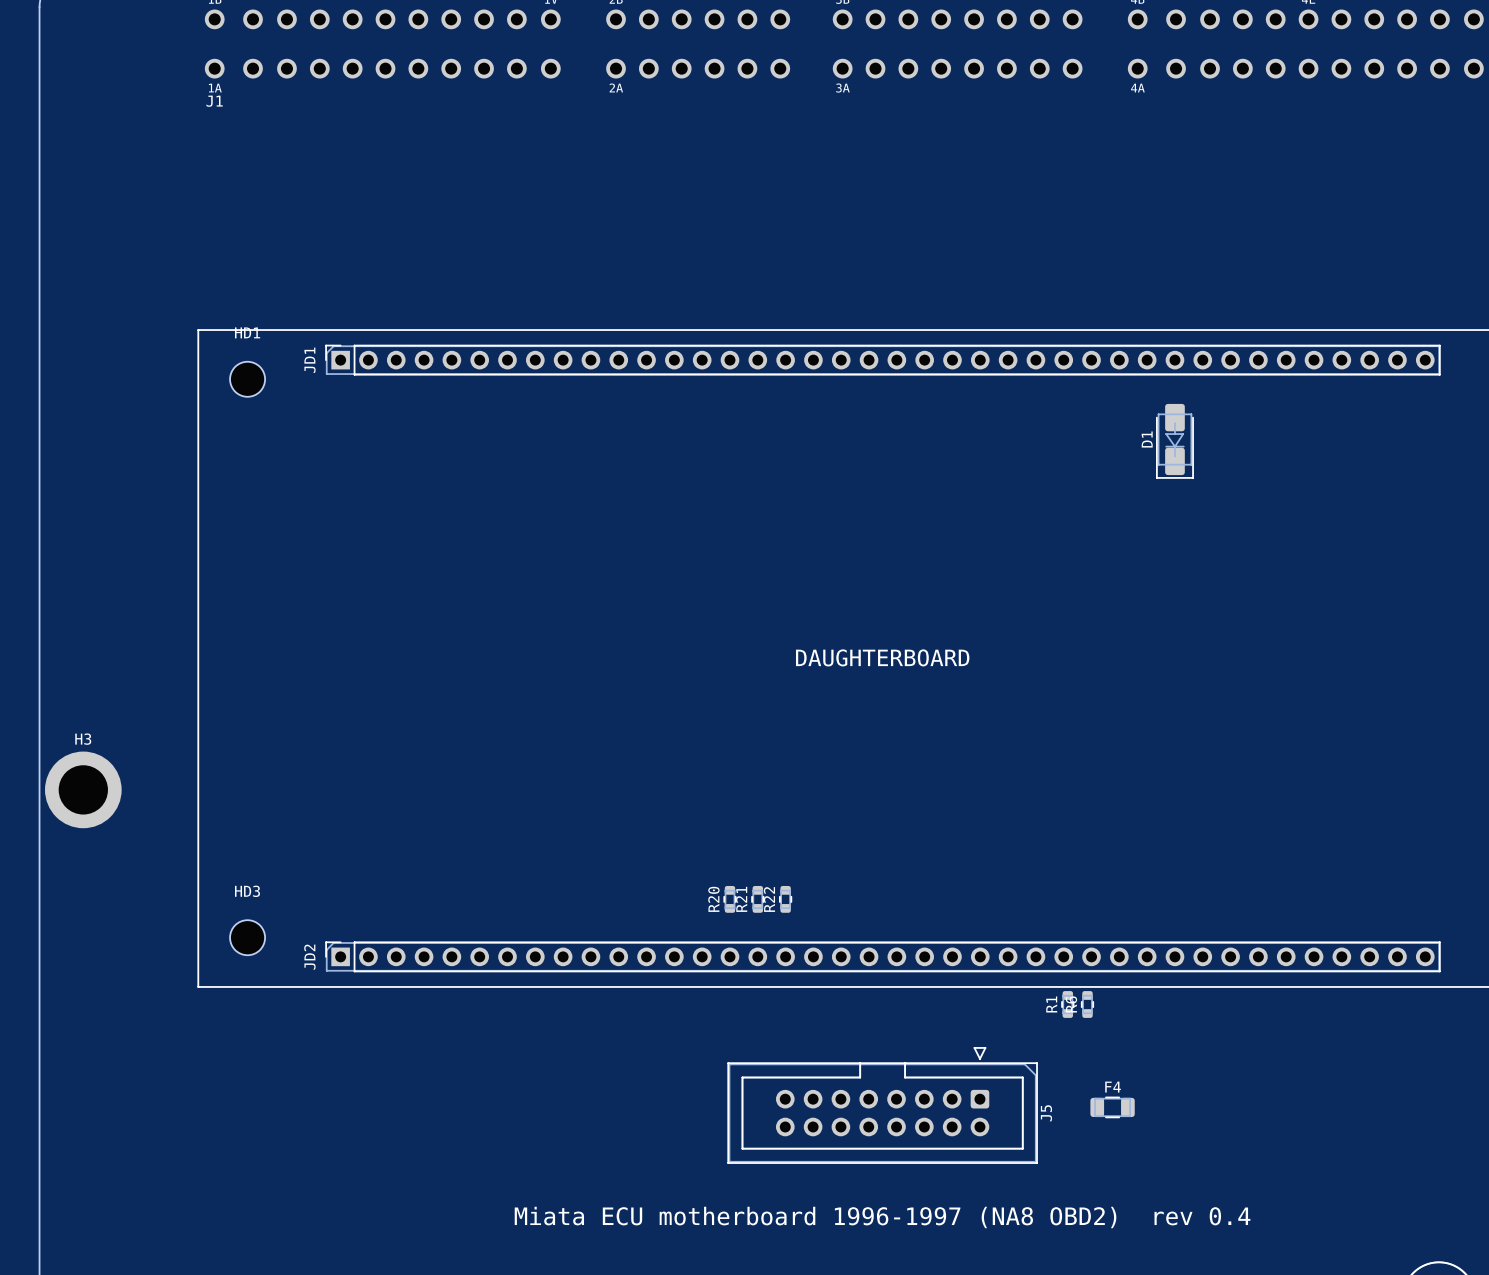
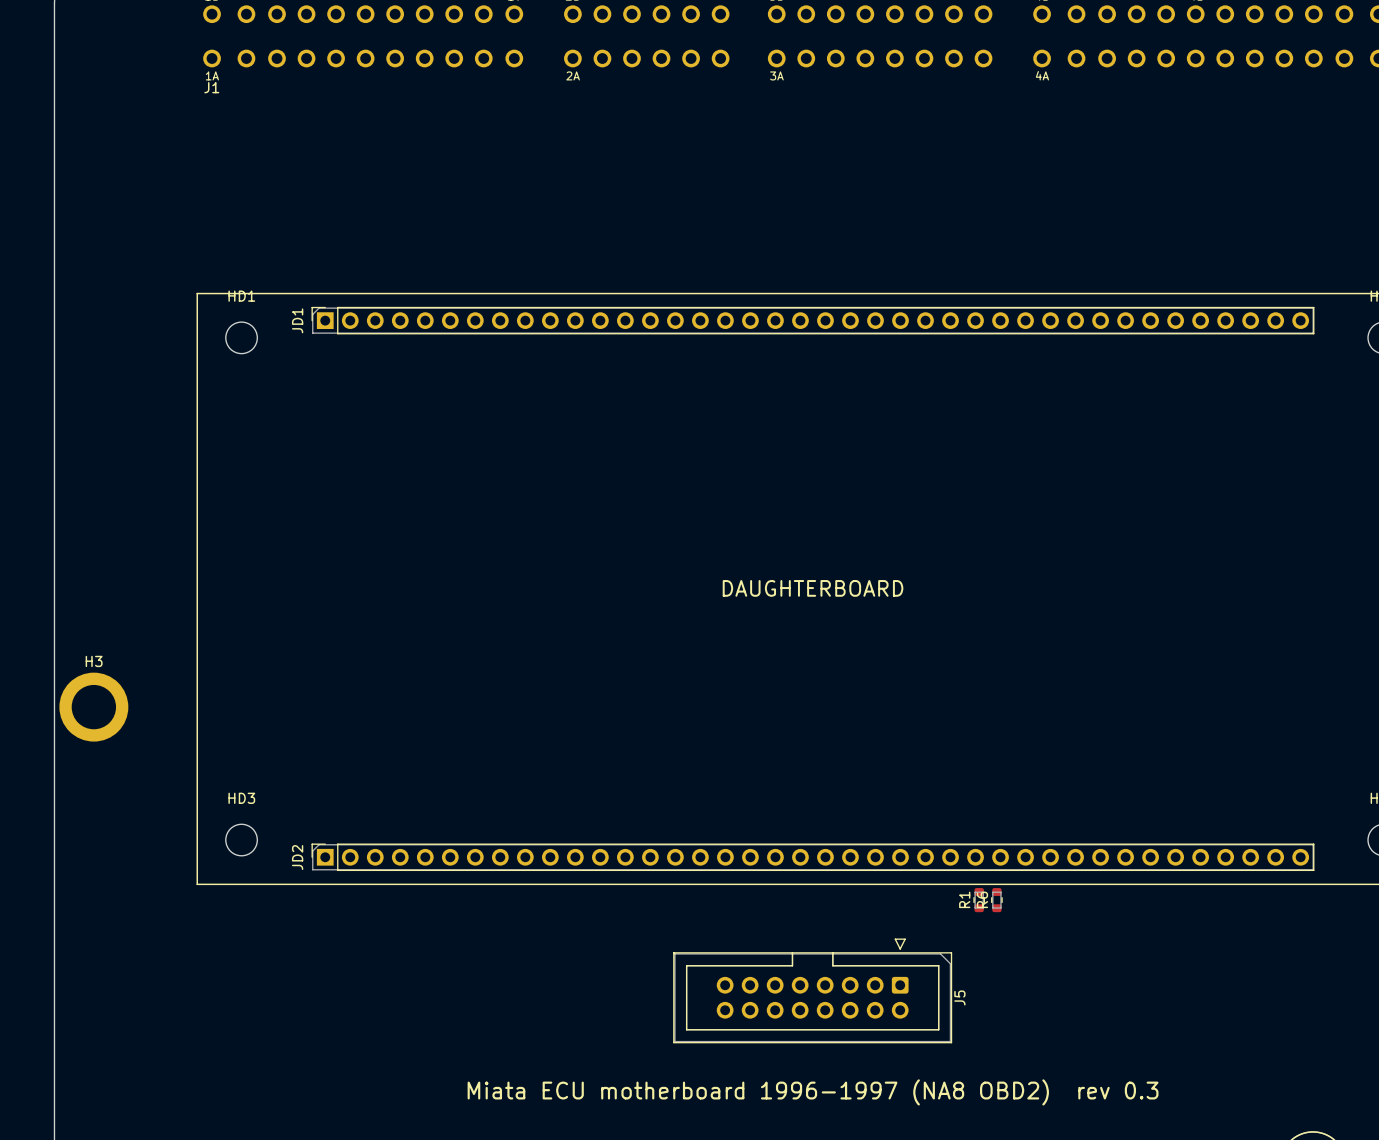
D1: (1174, 441) -> none
R20: (729, 899) -> none
R21: (757, 899) -> none
R22: (785, 899) -> none
F4: (1112, 1107) -> none
text: Miata ECU motherboard 1996-1997 (NA8 OBD2) rev 0.4 (882, 1217) -> Miata ECU motherboard 1996-1997 (NA8 OBD2) rev 0.3 (813, 1092)

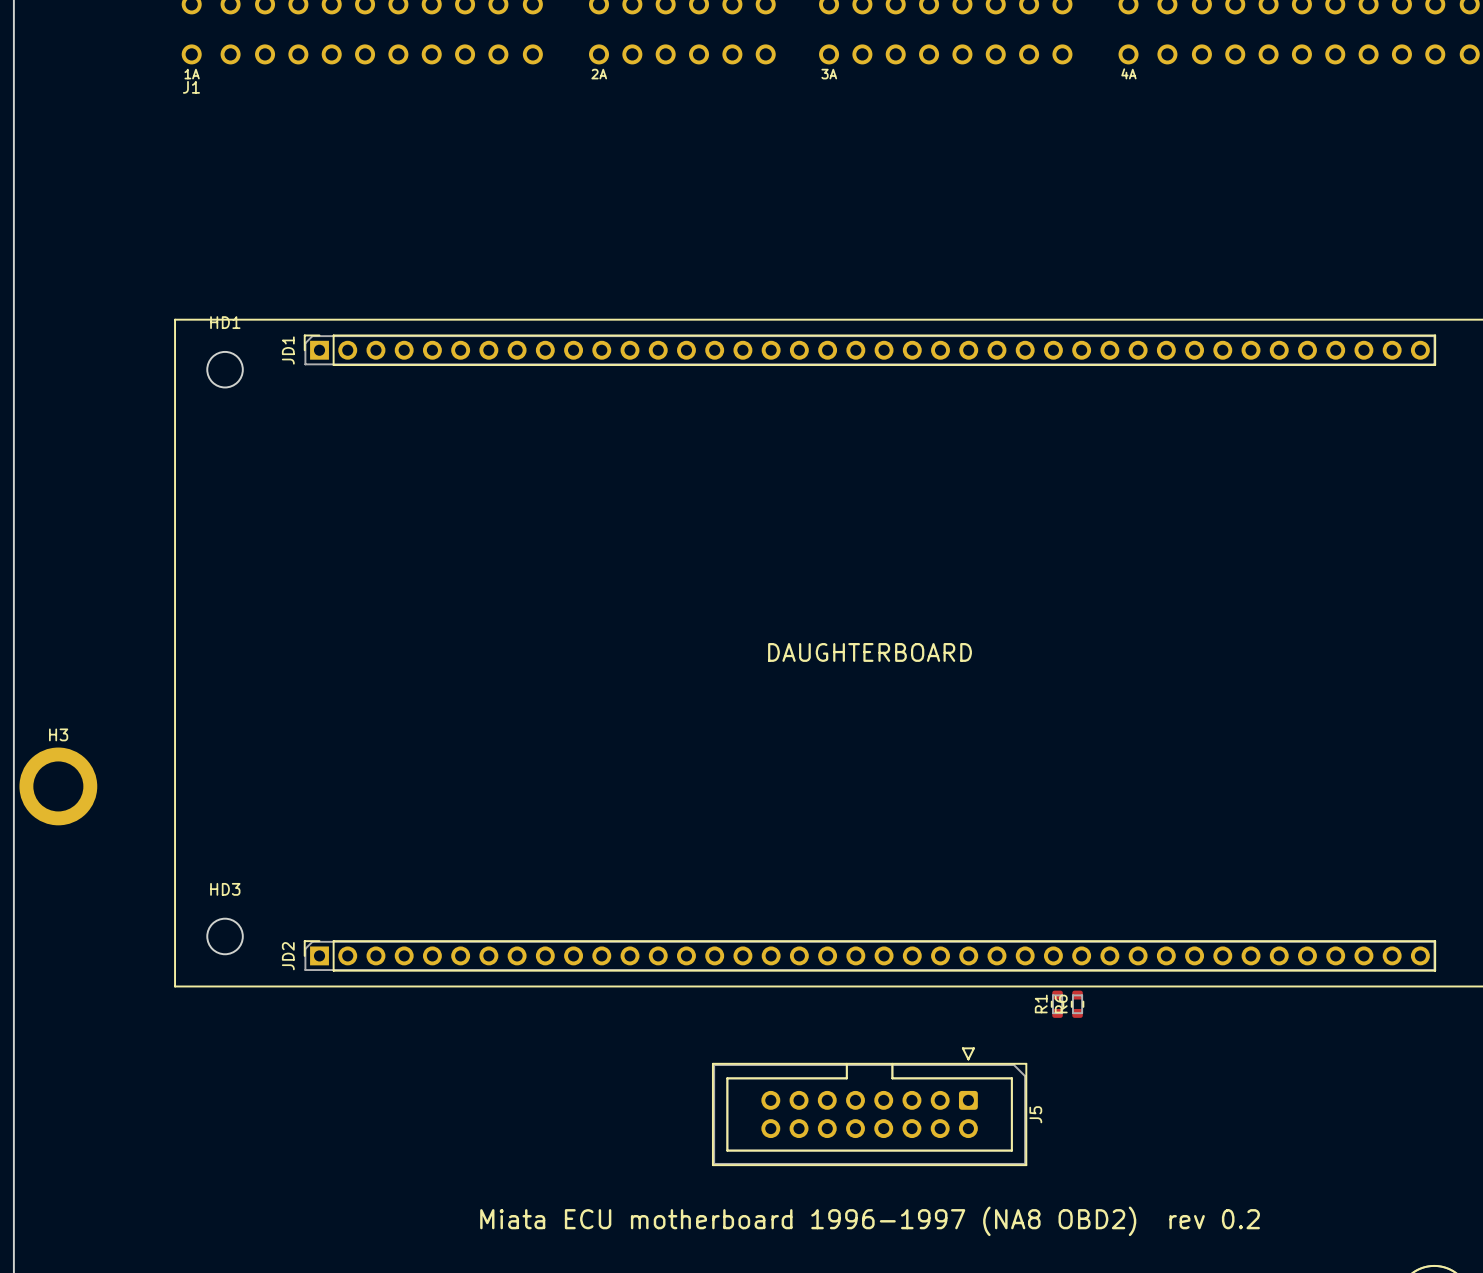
text: Miata ECU motherboard 1996-1997 (NA8 OBD2) rev 0.3 (813, 1092) -> Miata ECU motherboard 1996-1997 (NA8 OBD2) rev 0.2 (870, 1221)

